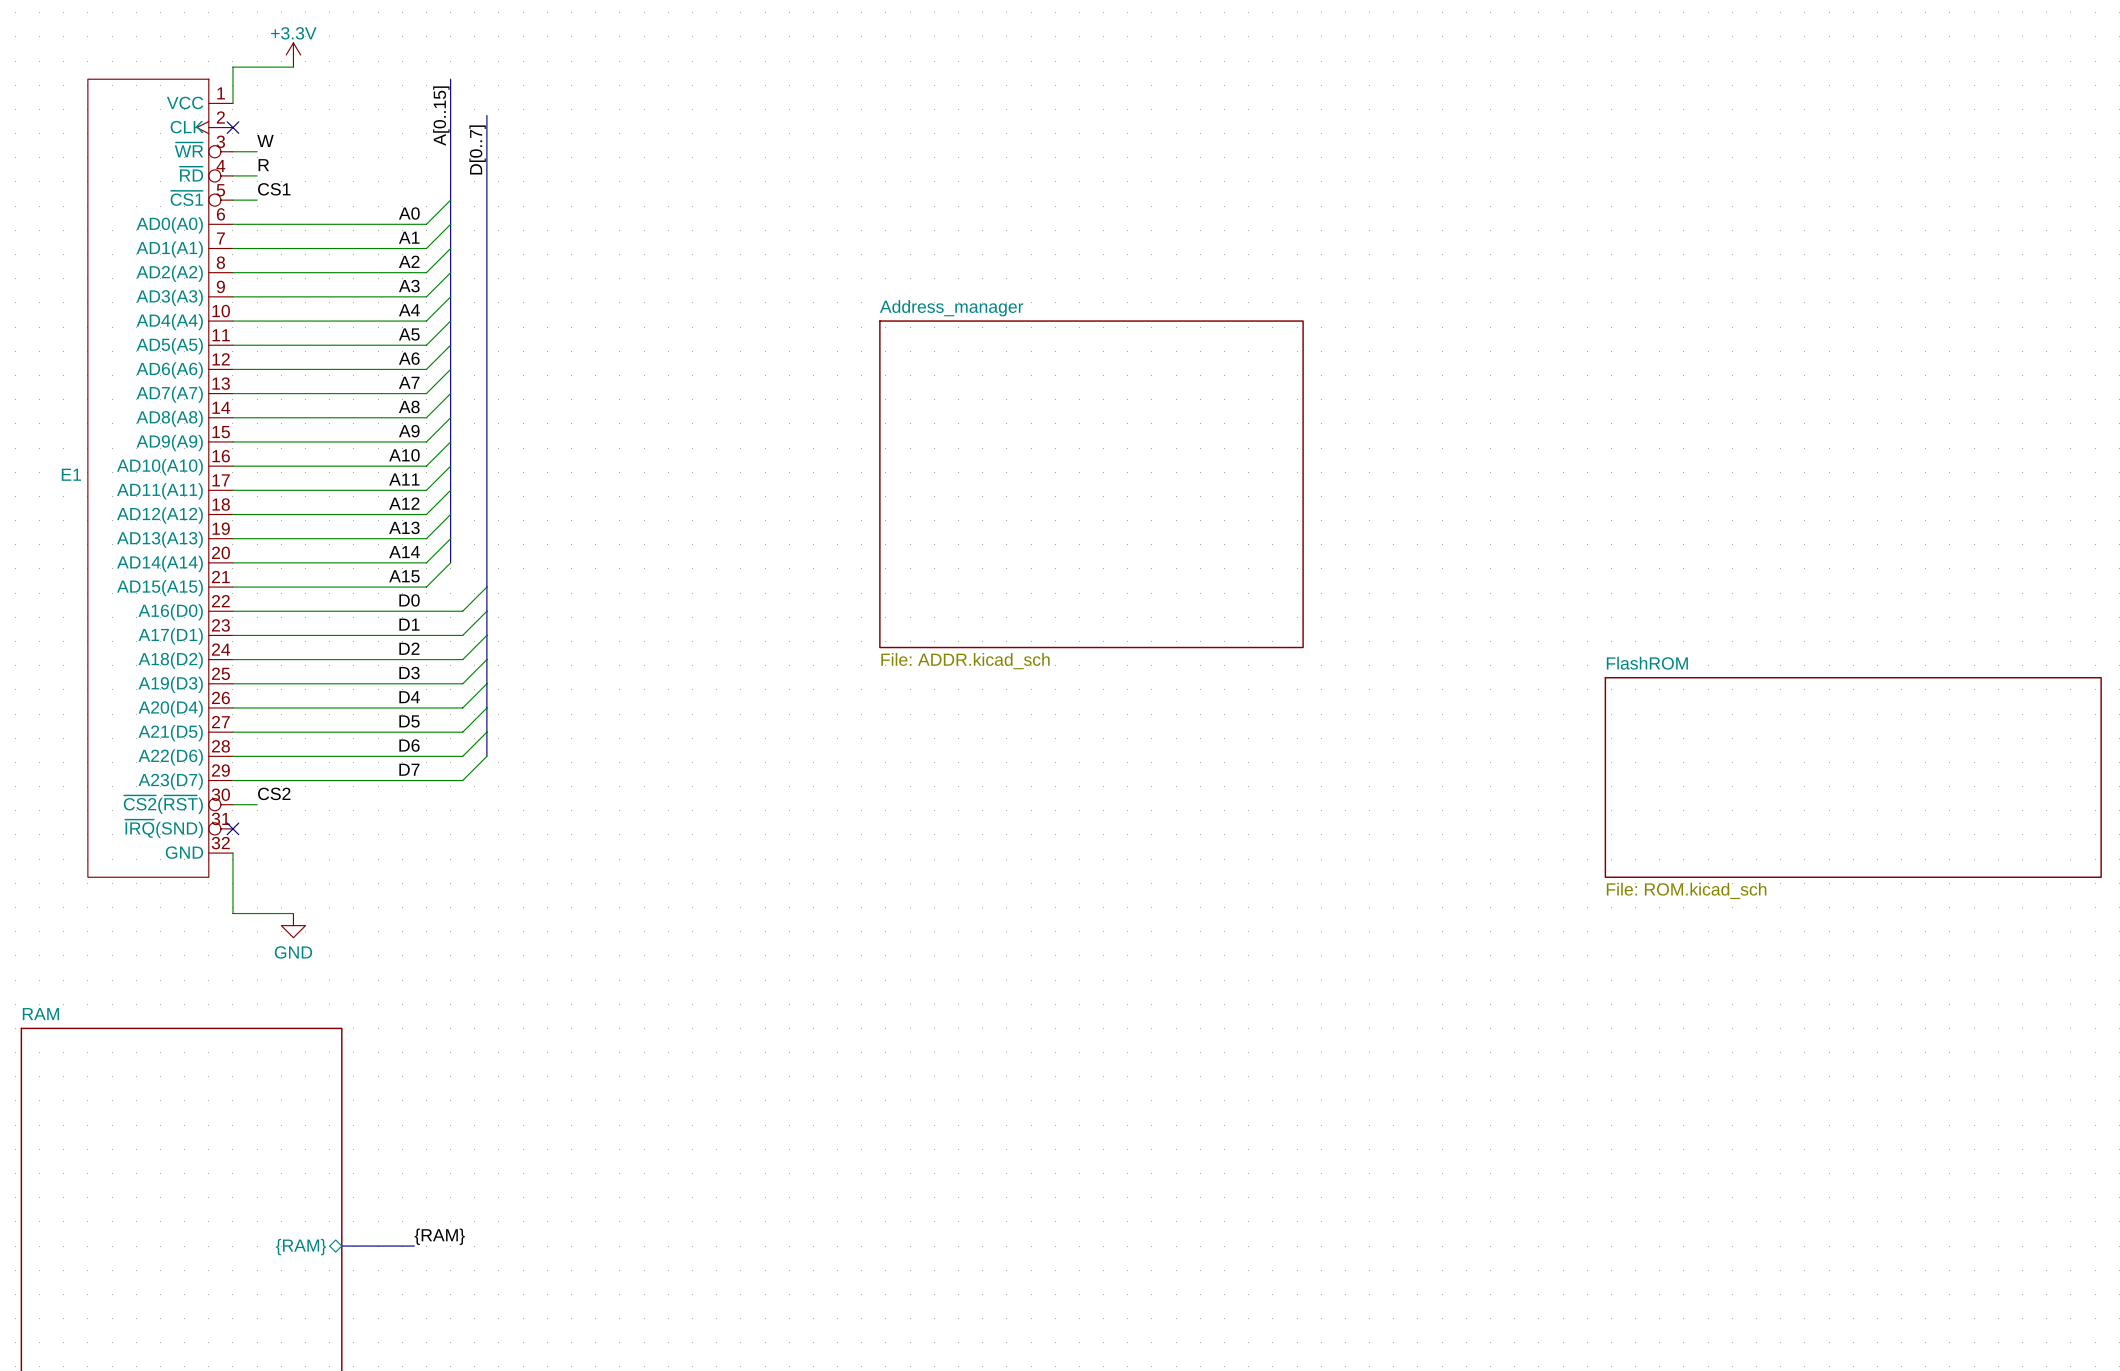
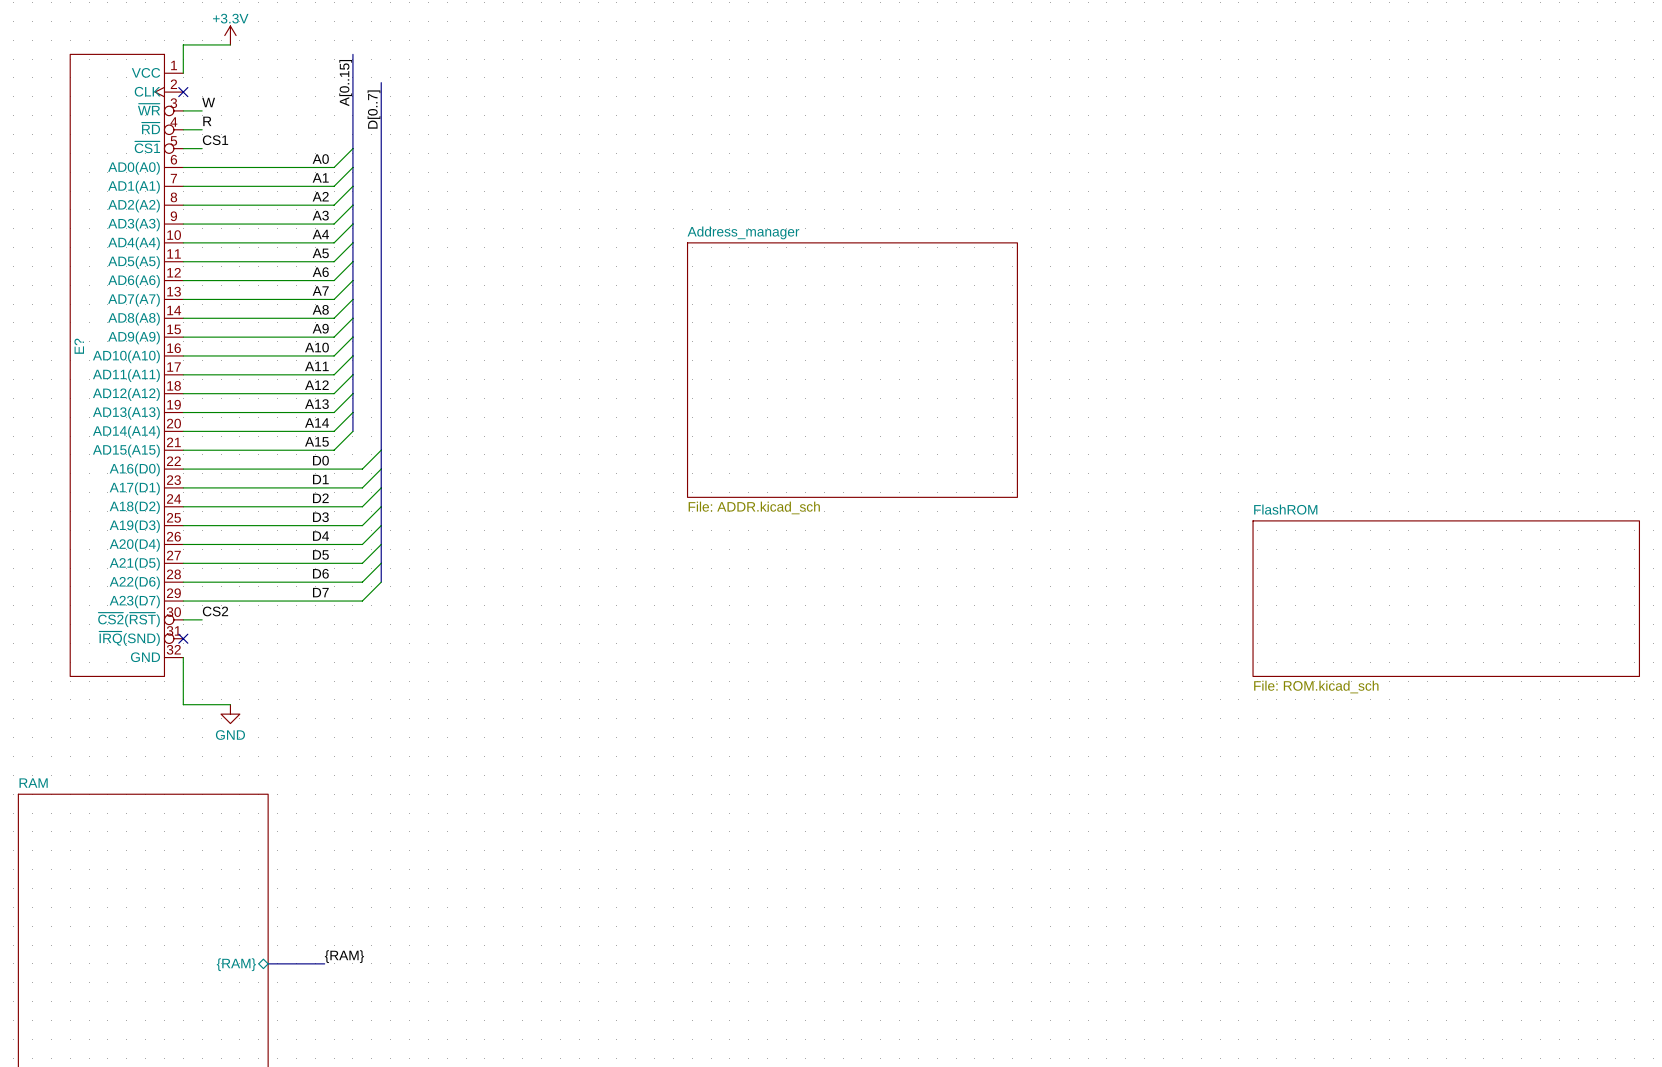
E1 name: E1 (71, 474) -> E? (79, 346)

